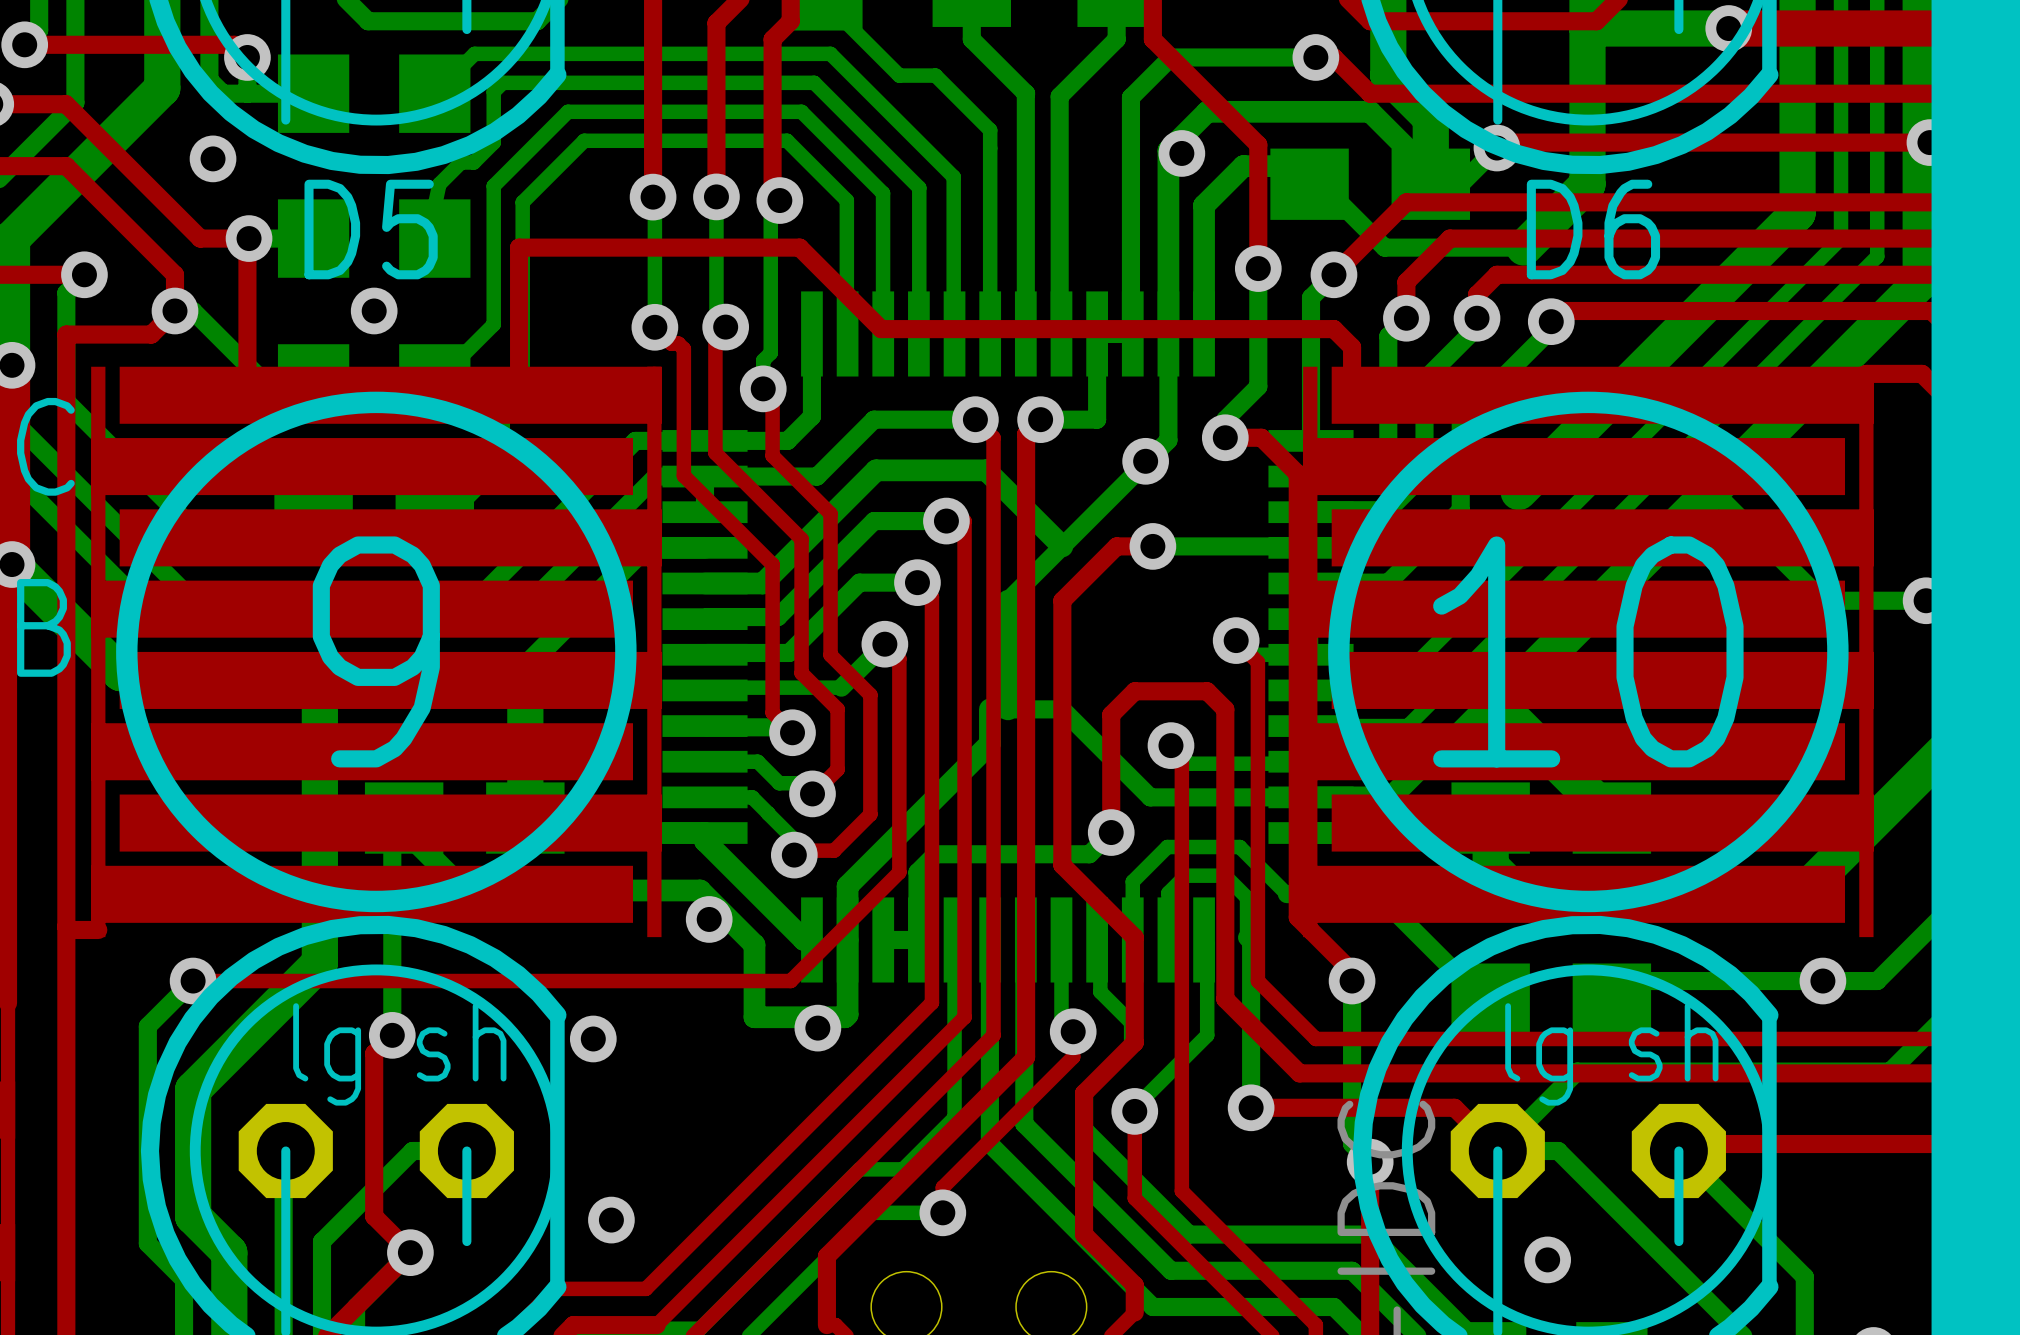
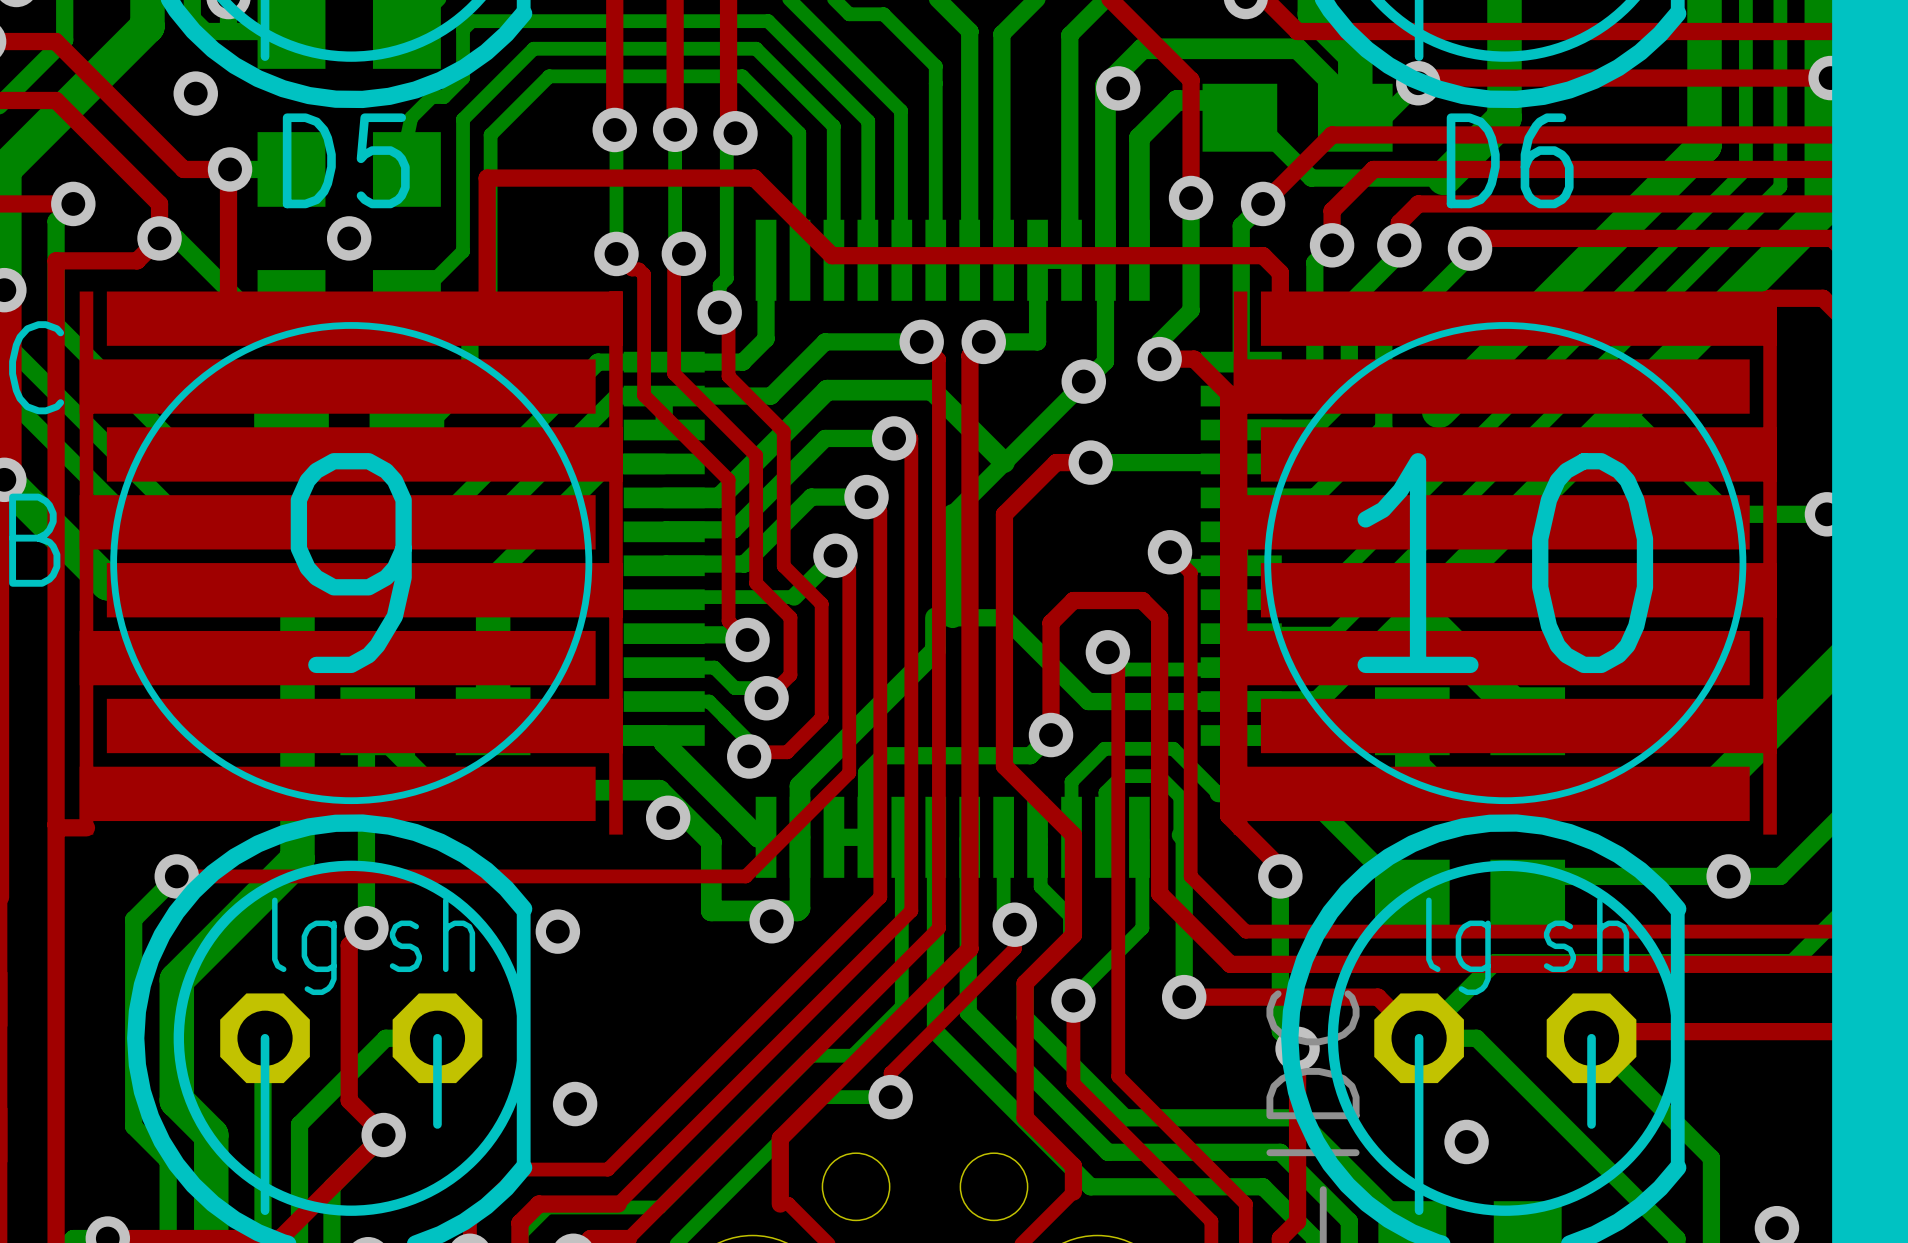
part footprint: [91, 366, 662, 938] -> [79, 291, 623, 835]
part footprint: [1303, 366, 1874, 938] -> [1233, 291, 1777, 835]

